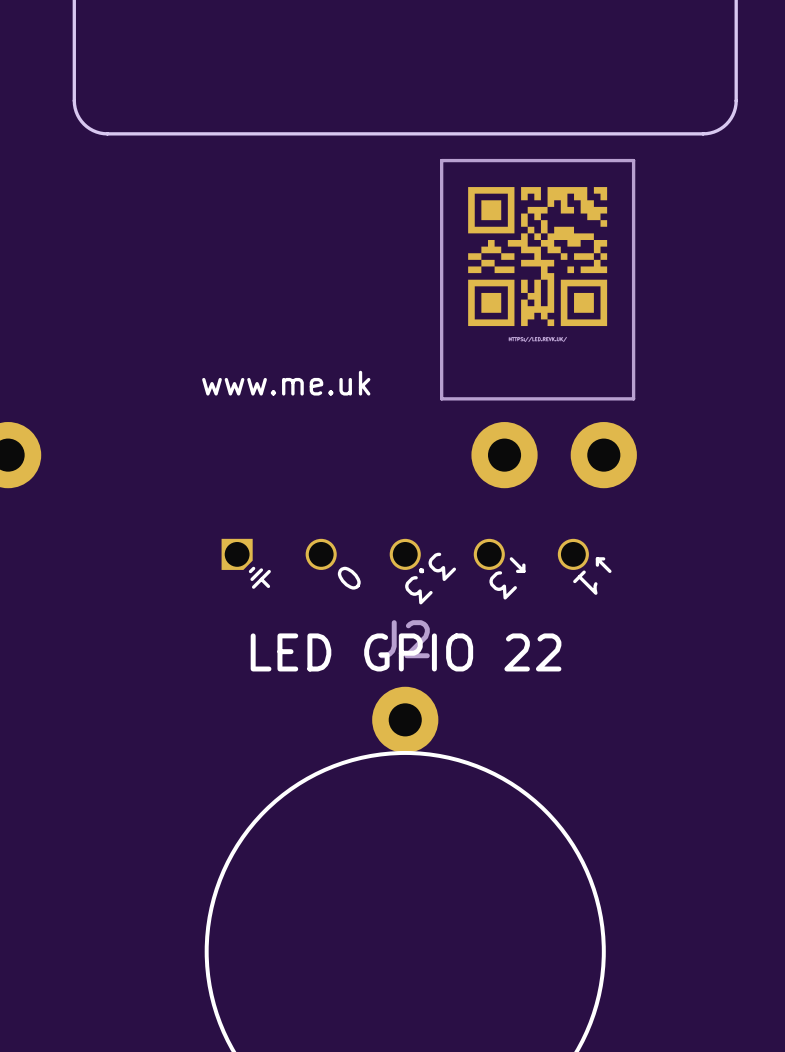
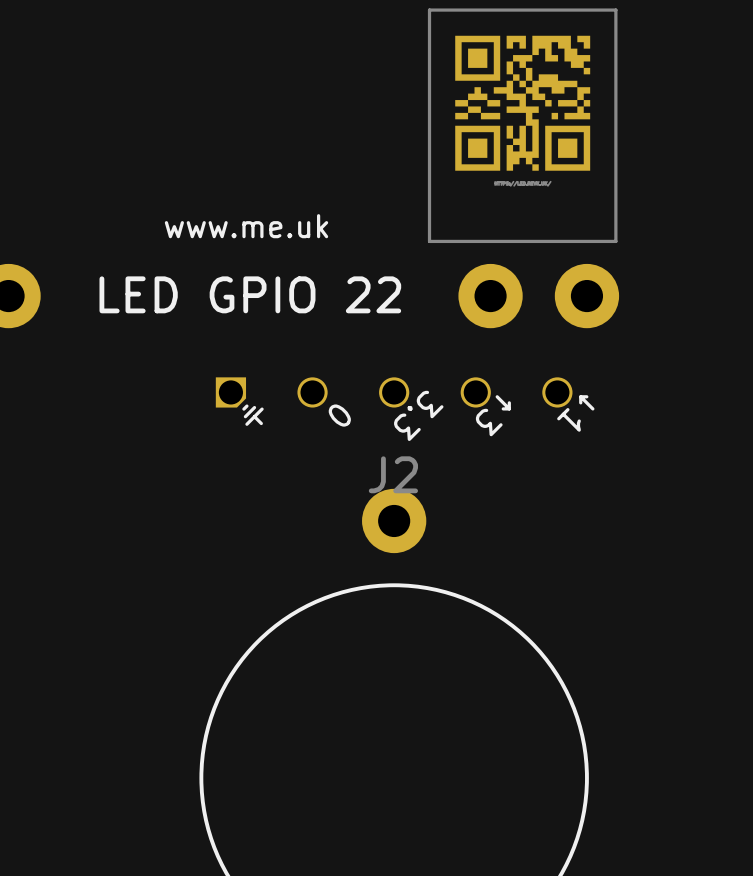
drawing position: (286, 383) -> (246, 226)
text position: LED GPIO 22 (406, 652) -> LED GPIO 22 (250, 294)
part position: (405, 719) -> (394, 520)

